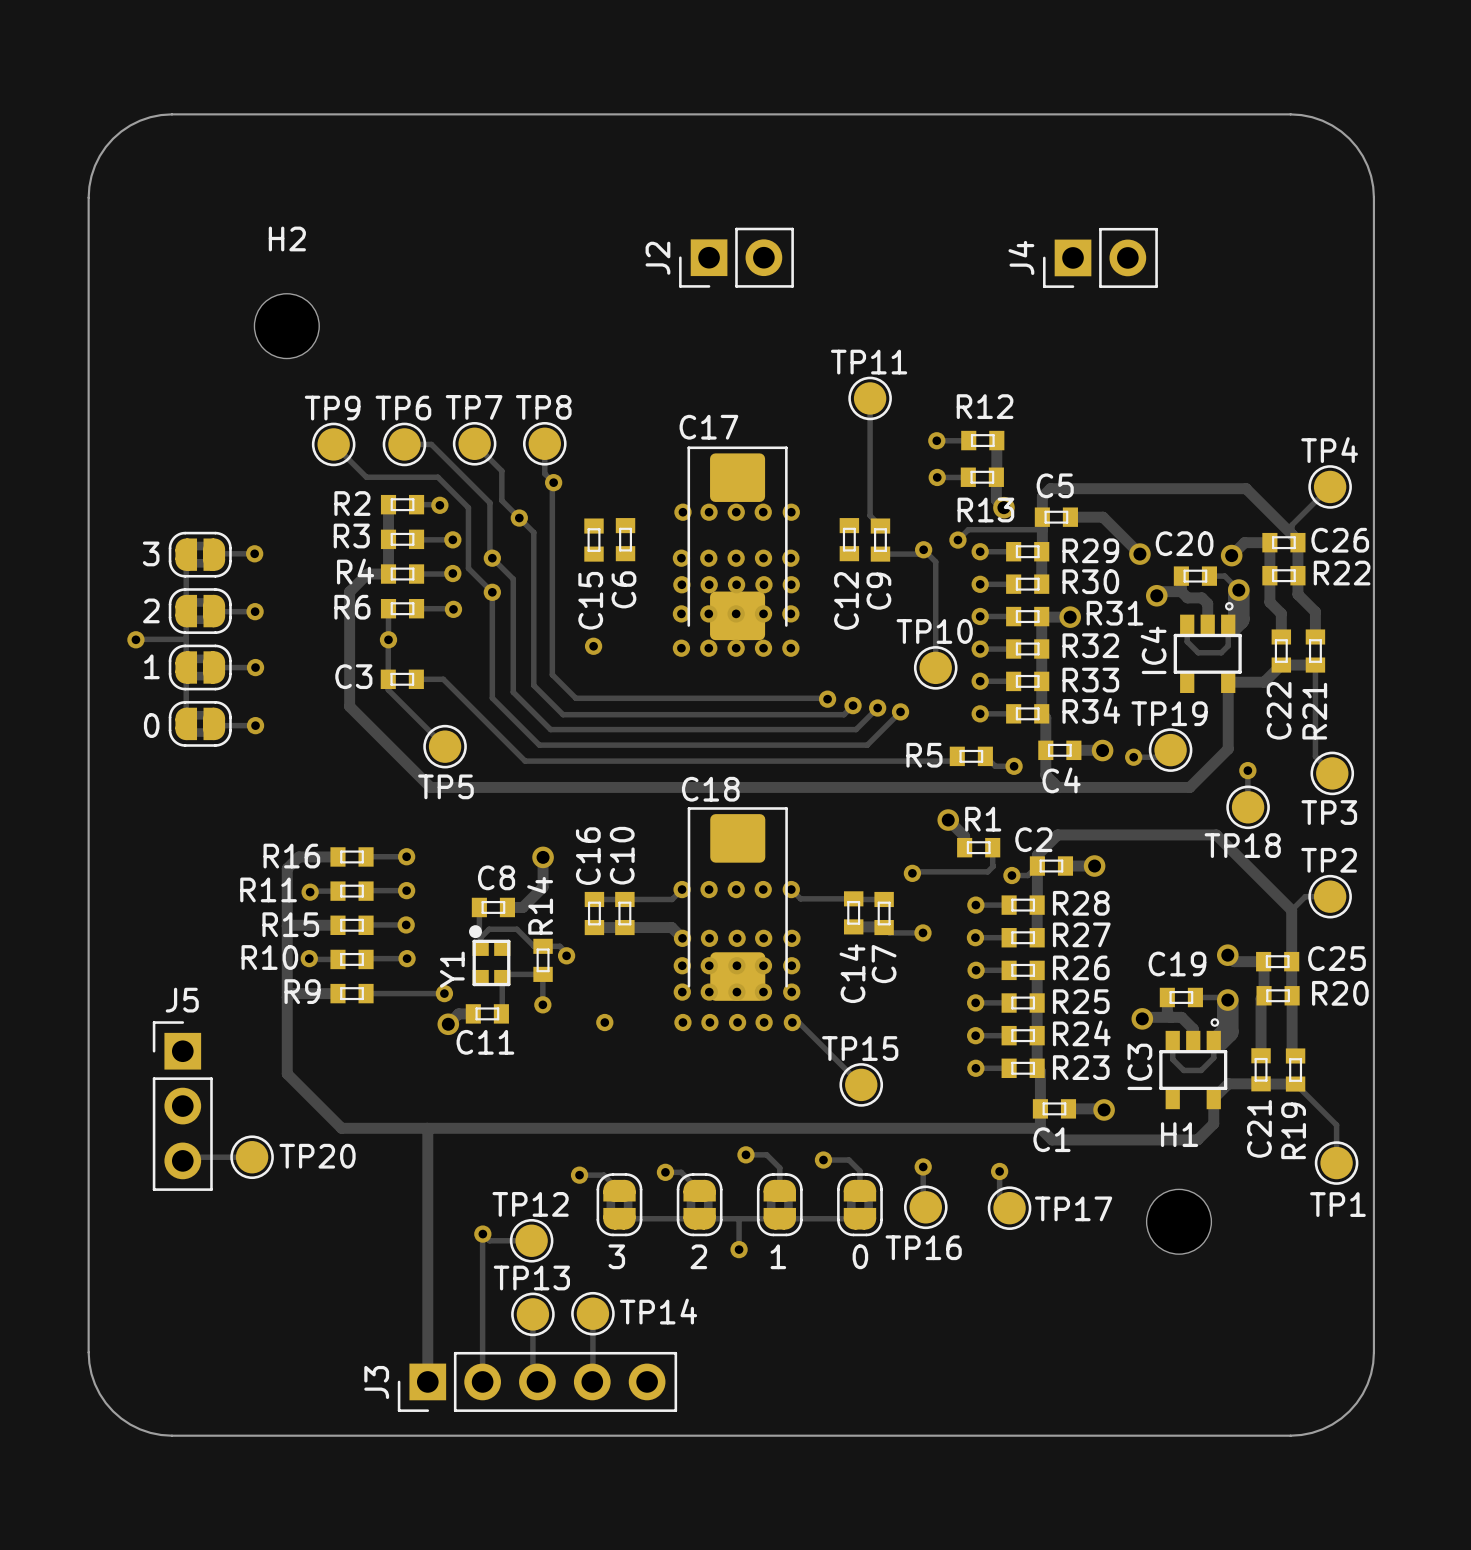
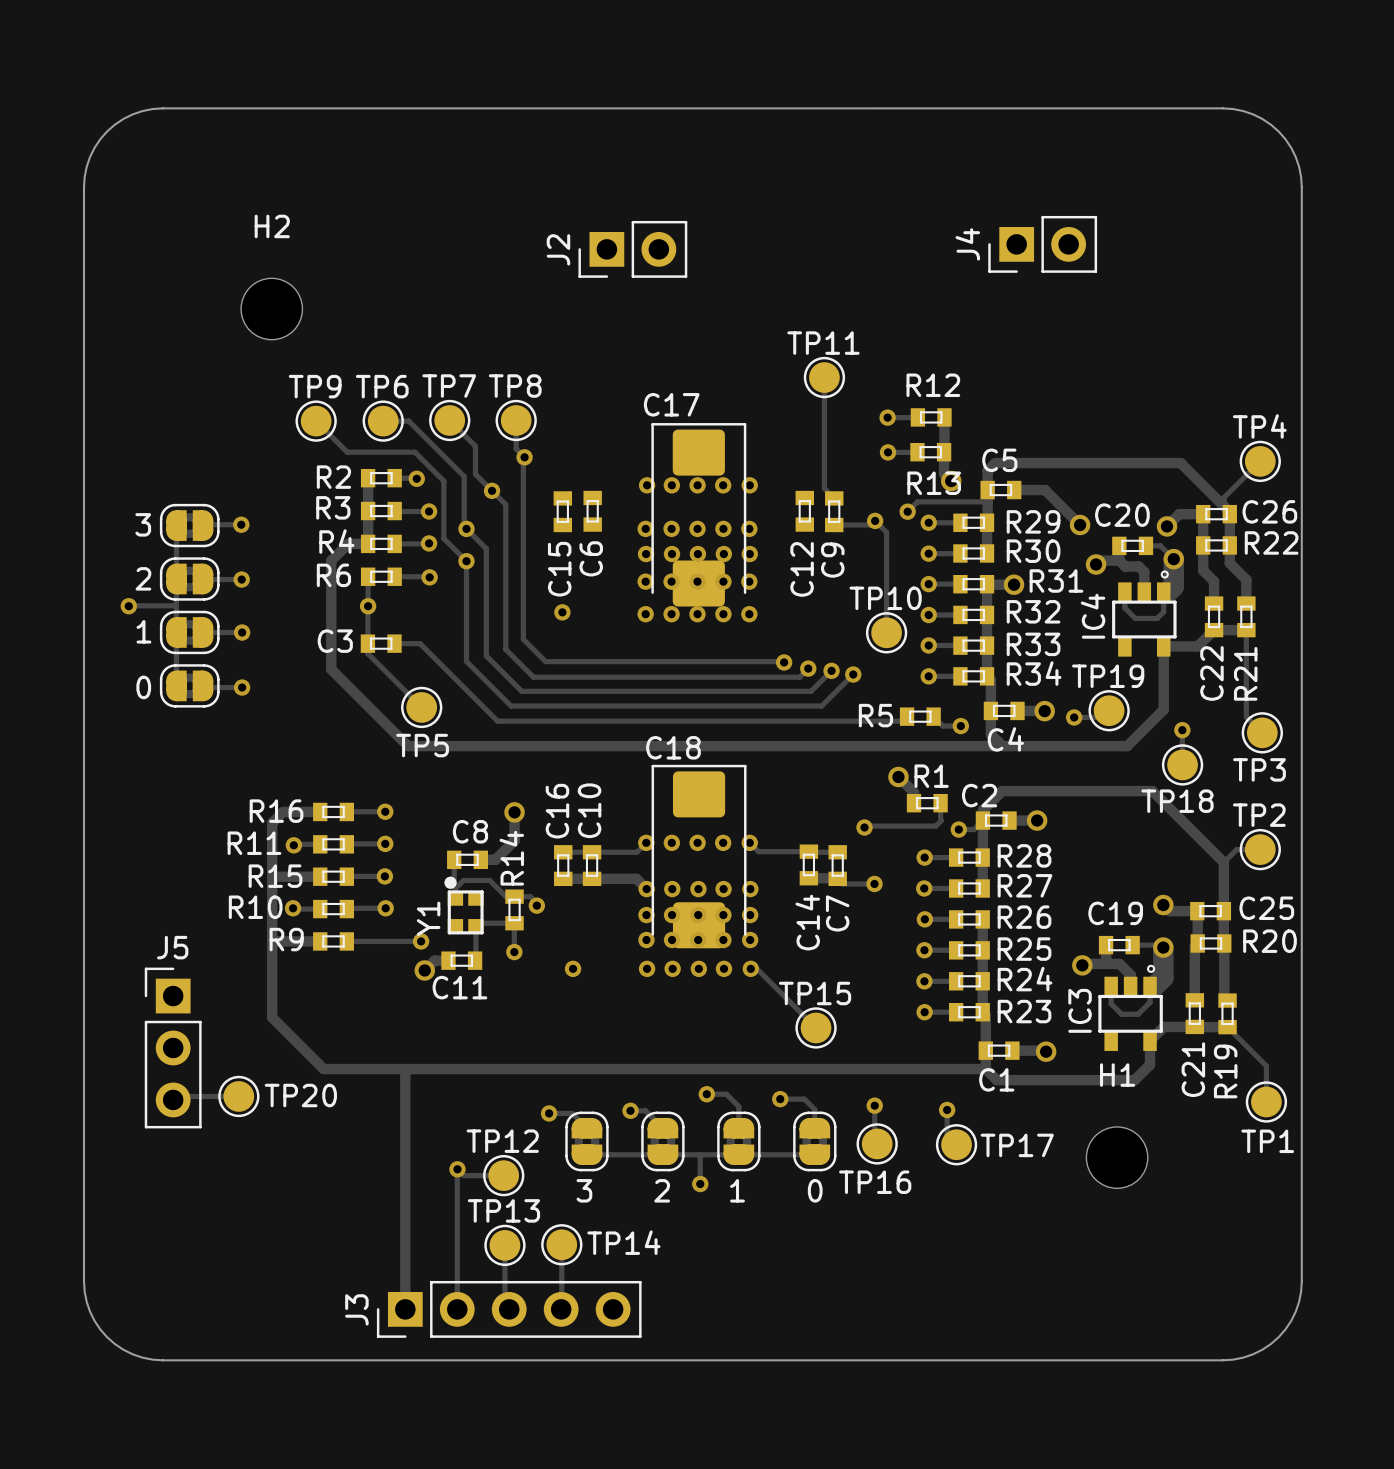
J2 position: (736, 257) -> (632, 249)

